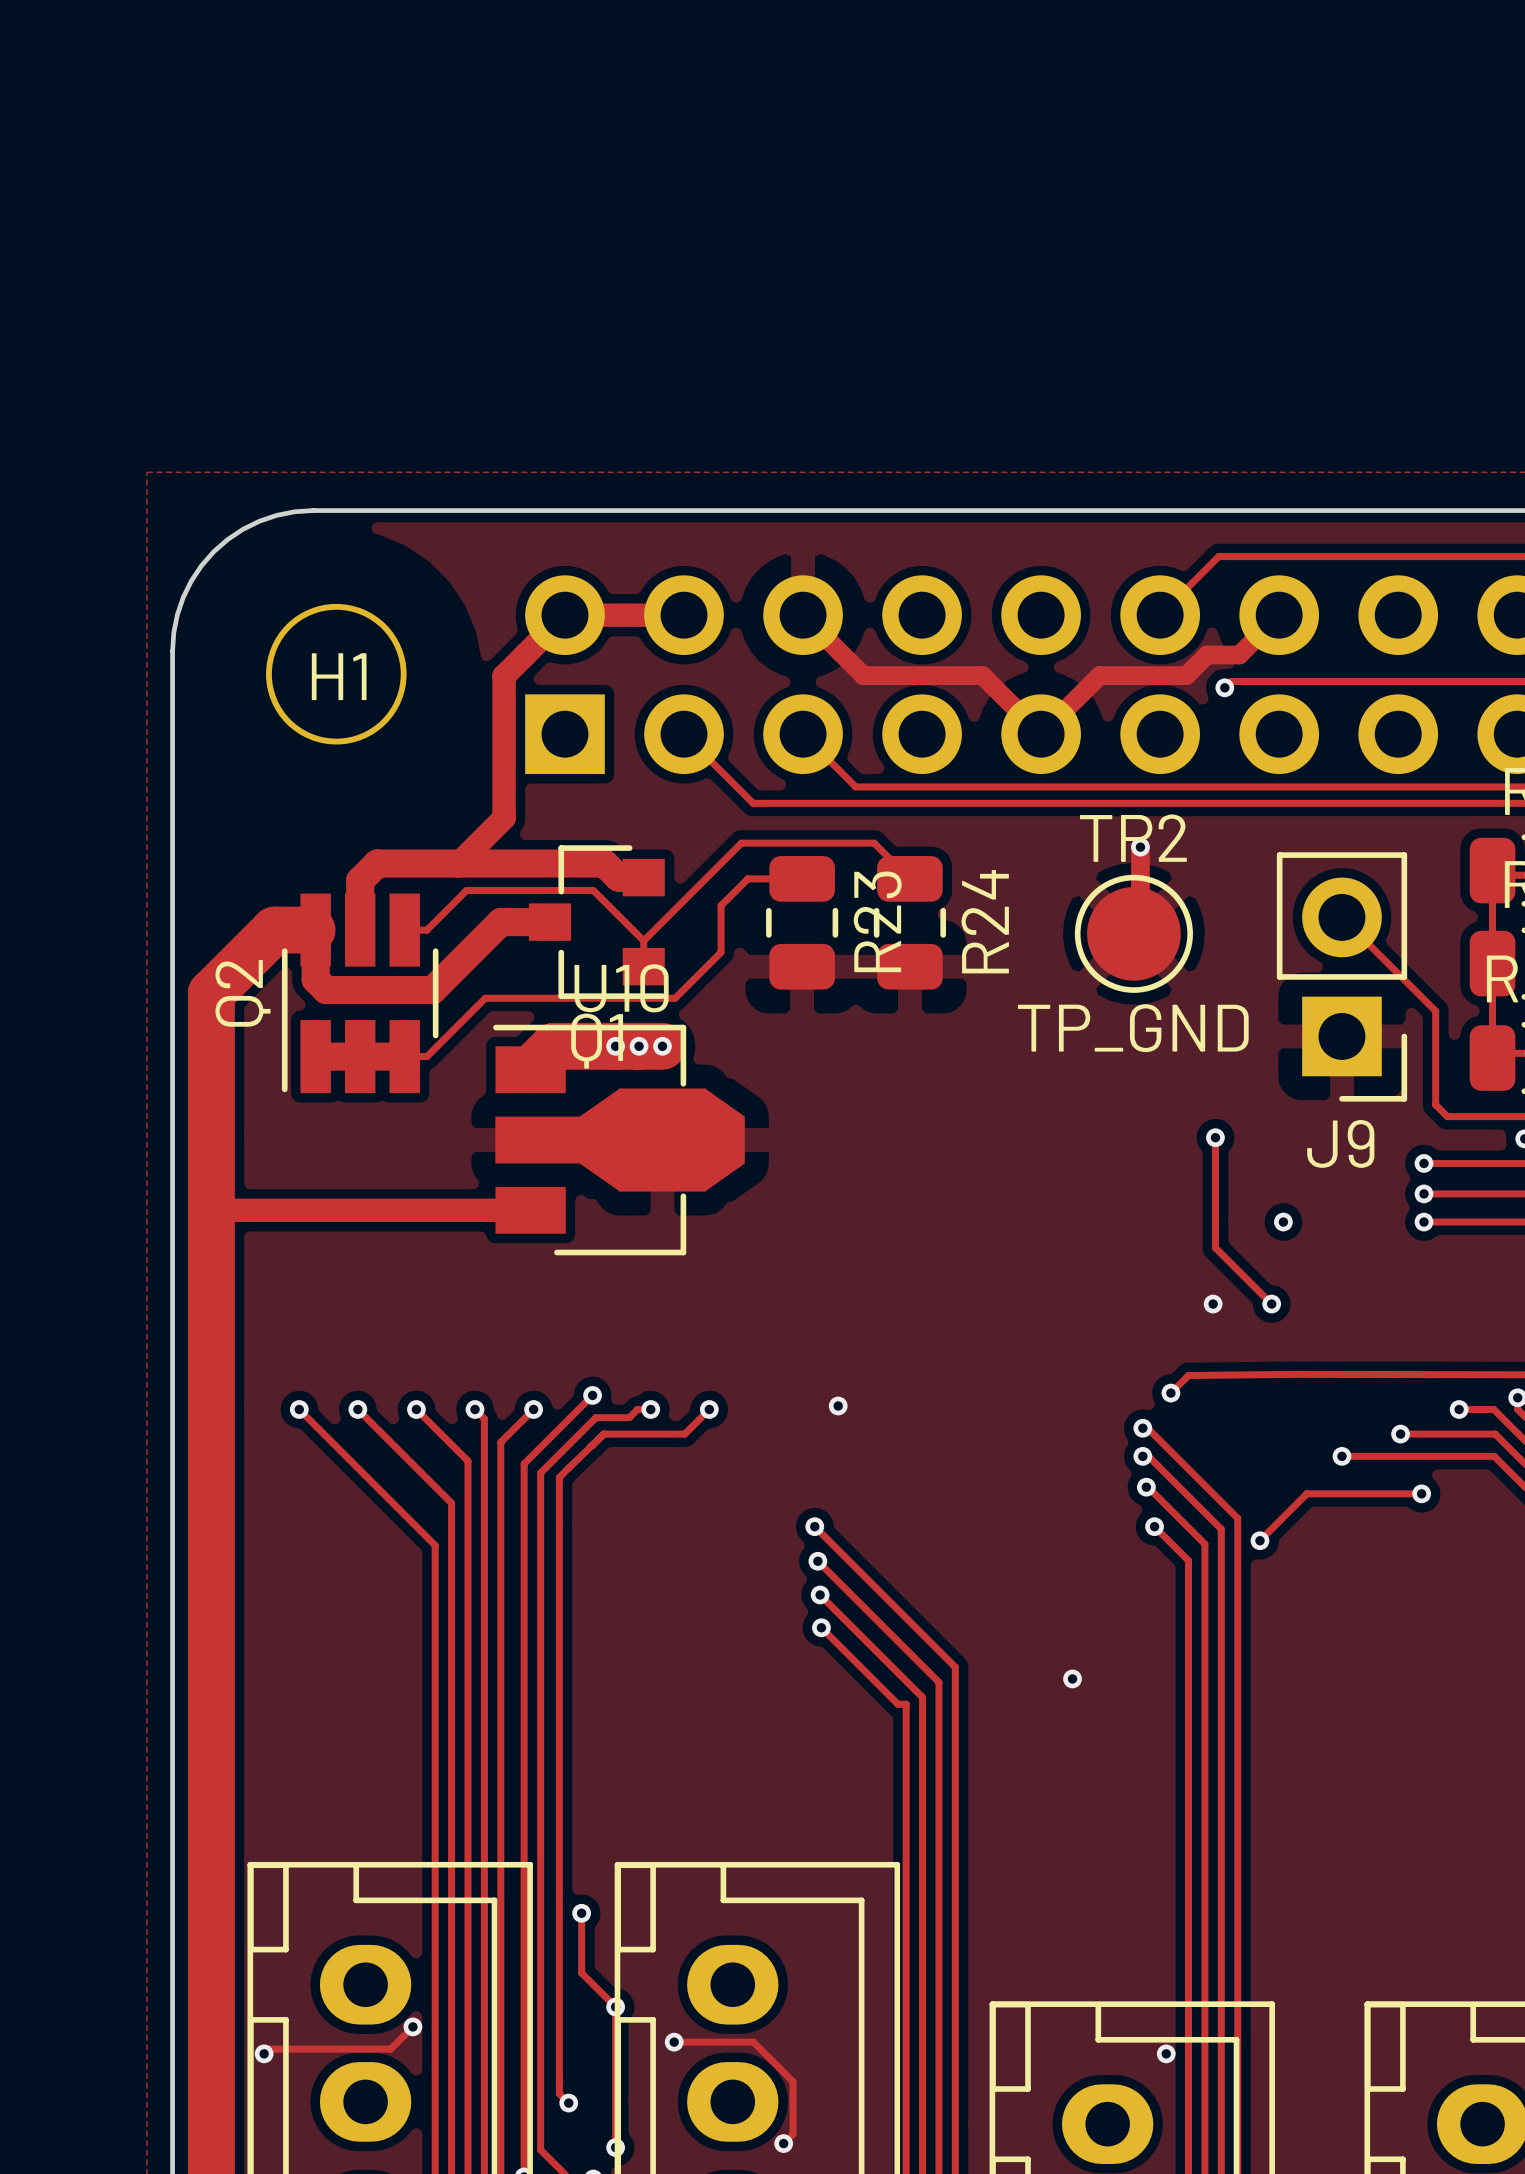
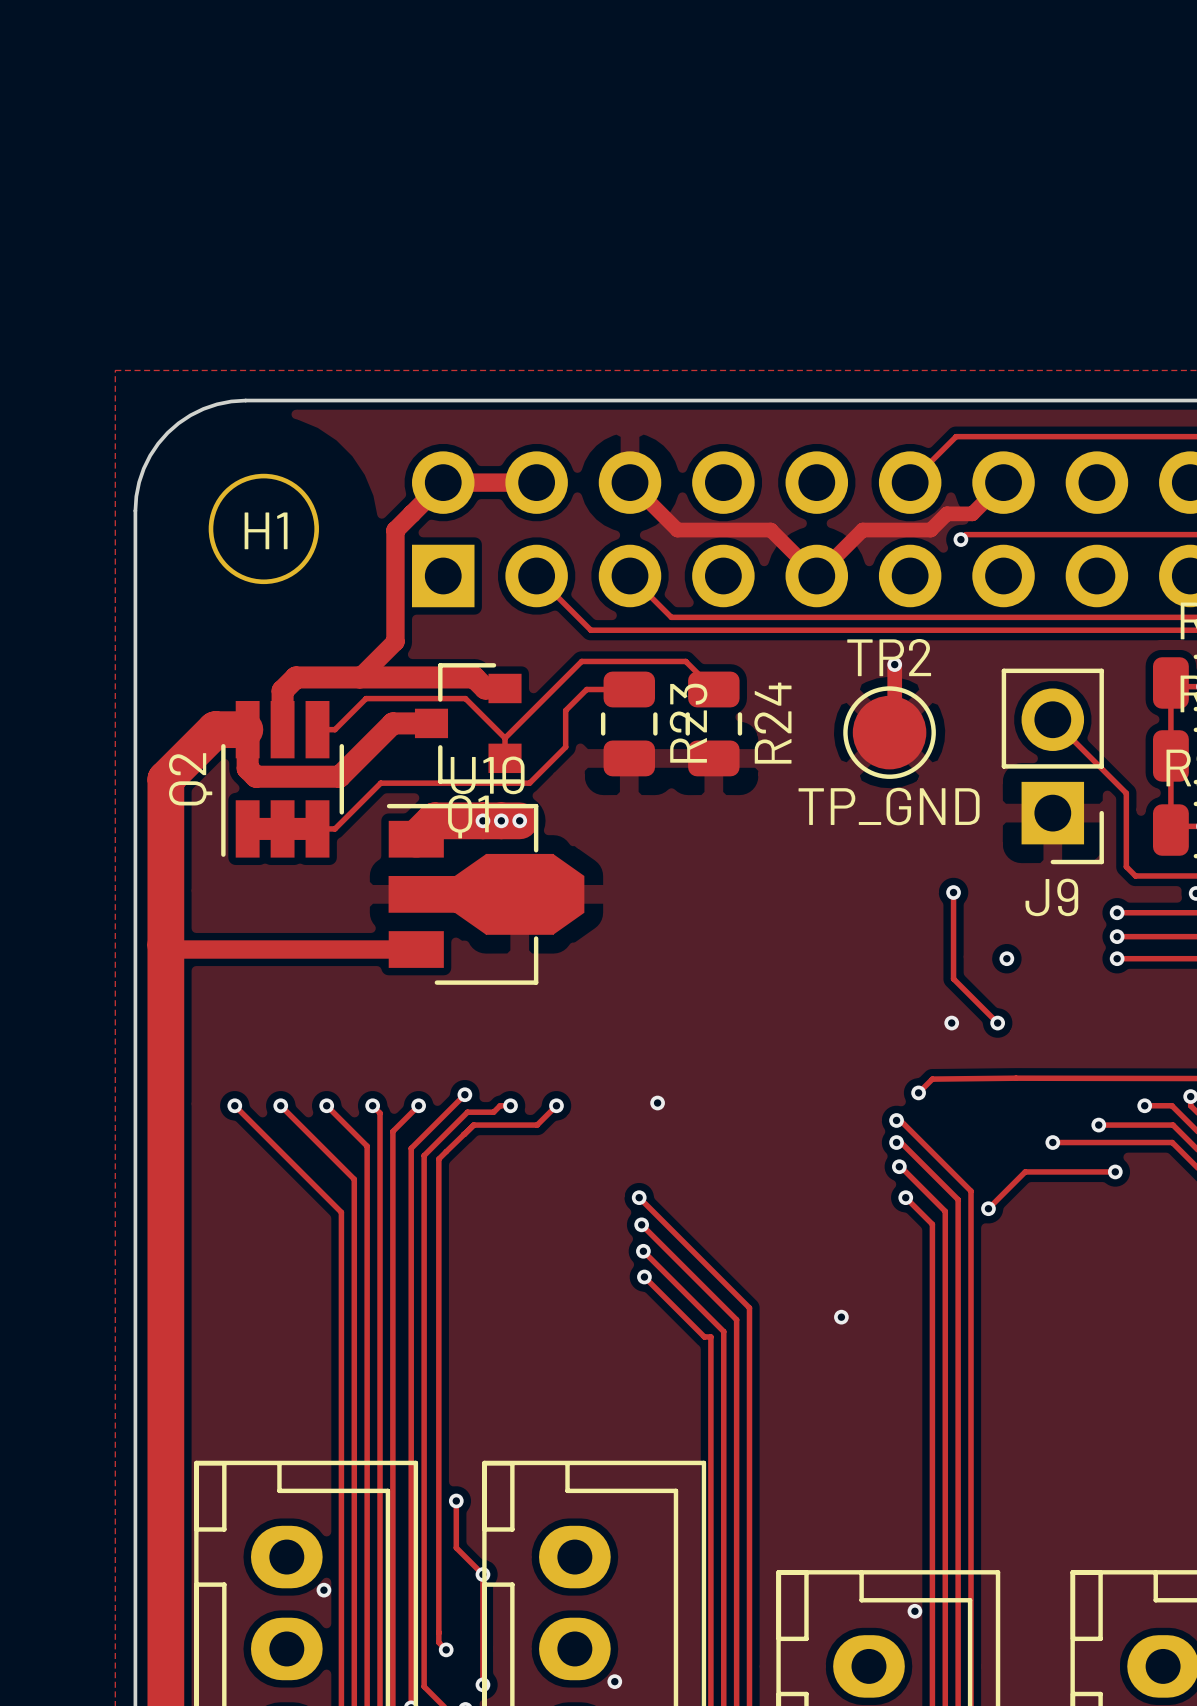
track: (412, 2026) (390, 2049) (268, 2049) (264, 2053) -> none
track: (674, 2042) (753, 2042) (793, 2081) (793, 2134) (783, 2143) -> none
via: (674, 2042) -> none
via: (264, 2053) -> none

